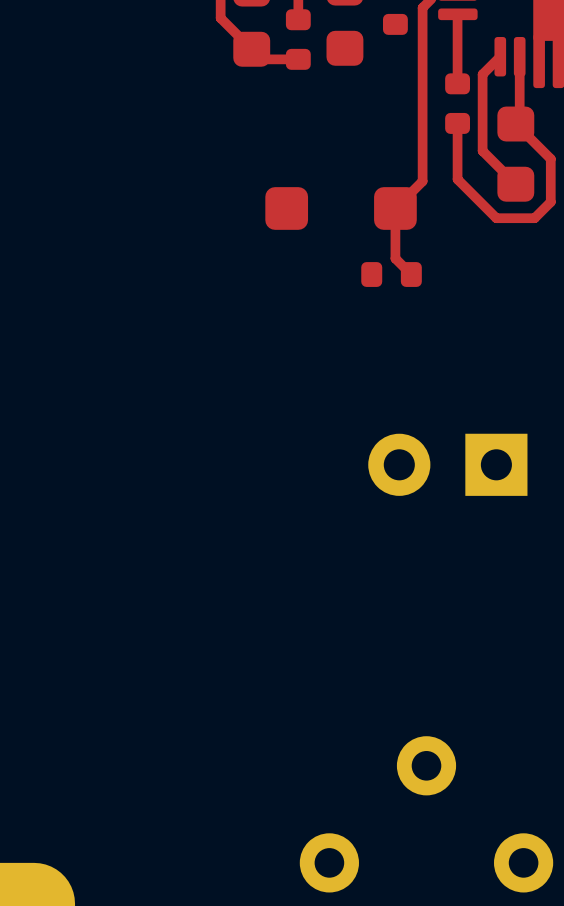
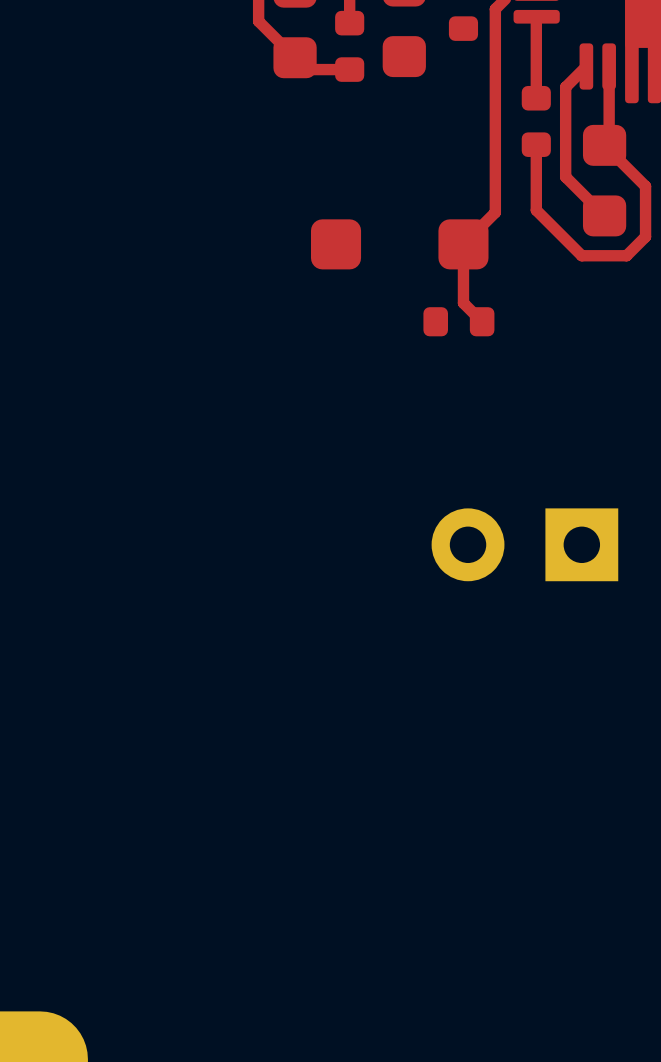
part: (426, 814) -> none

